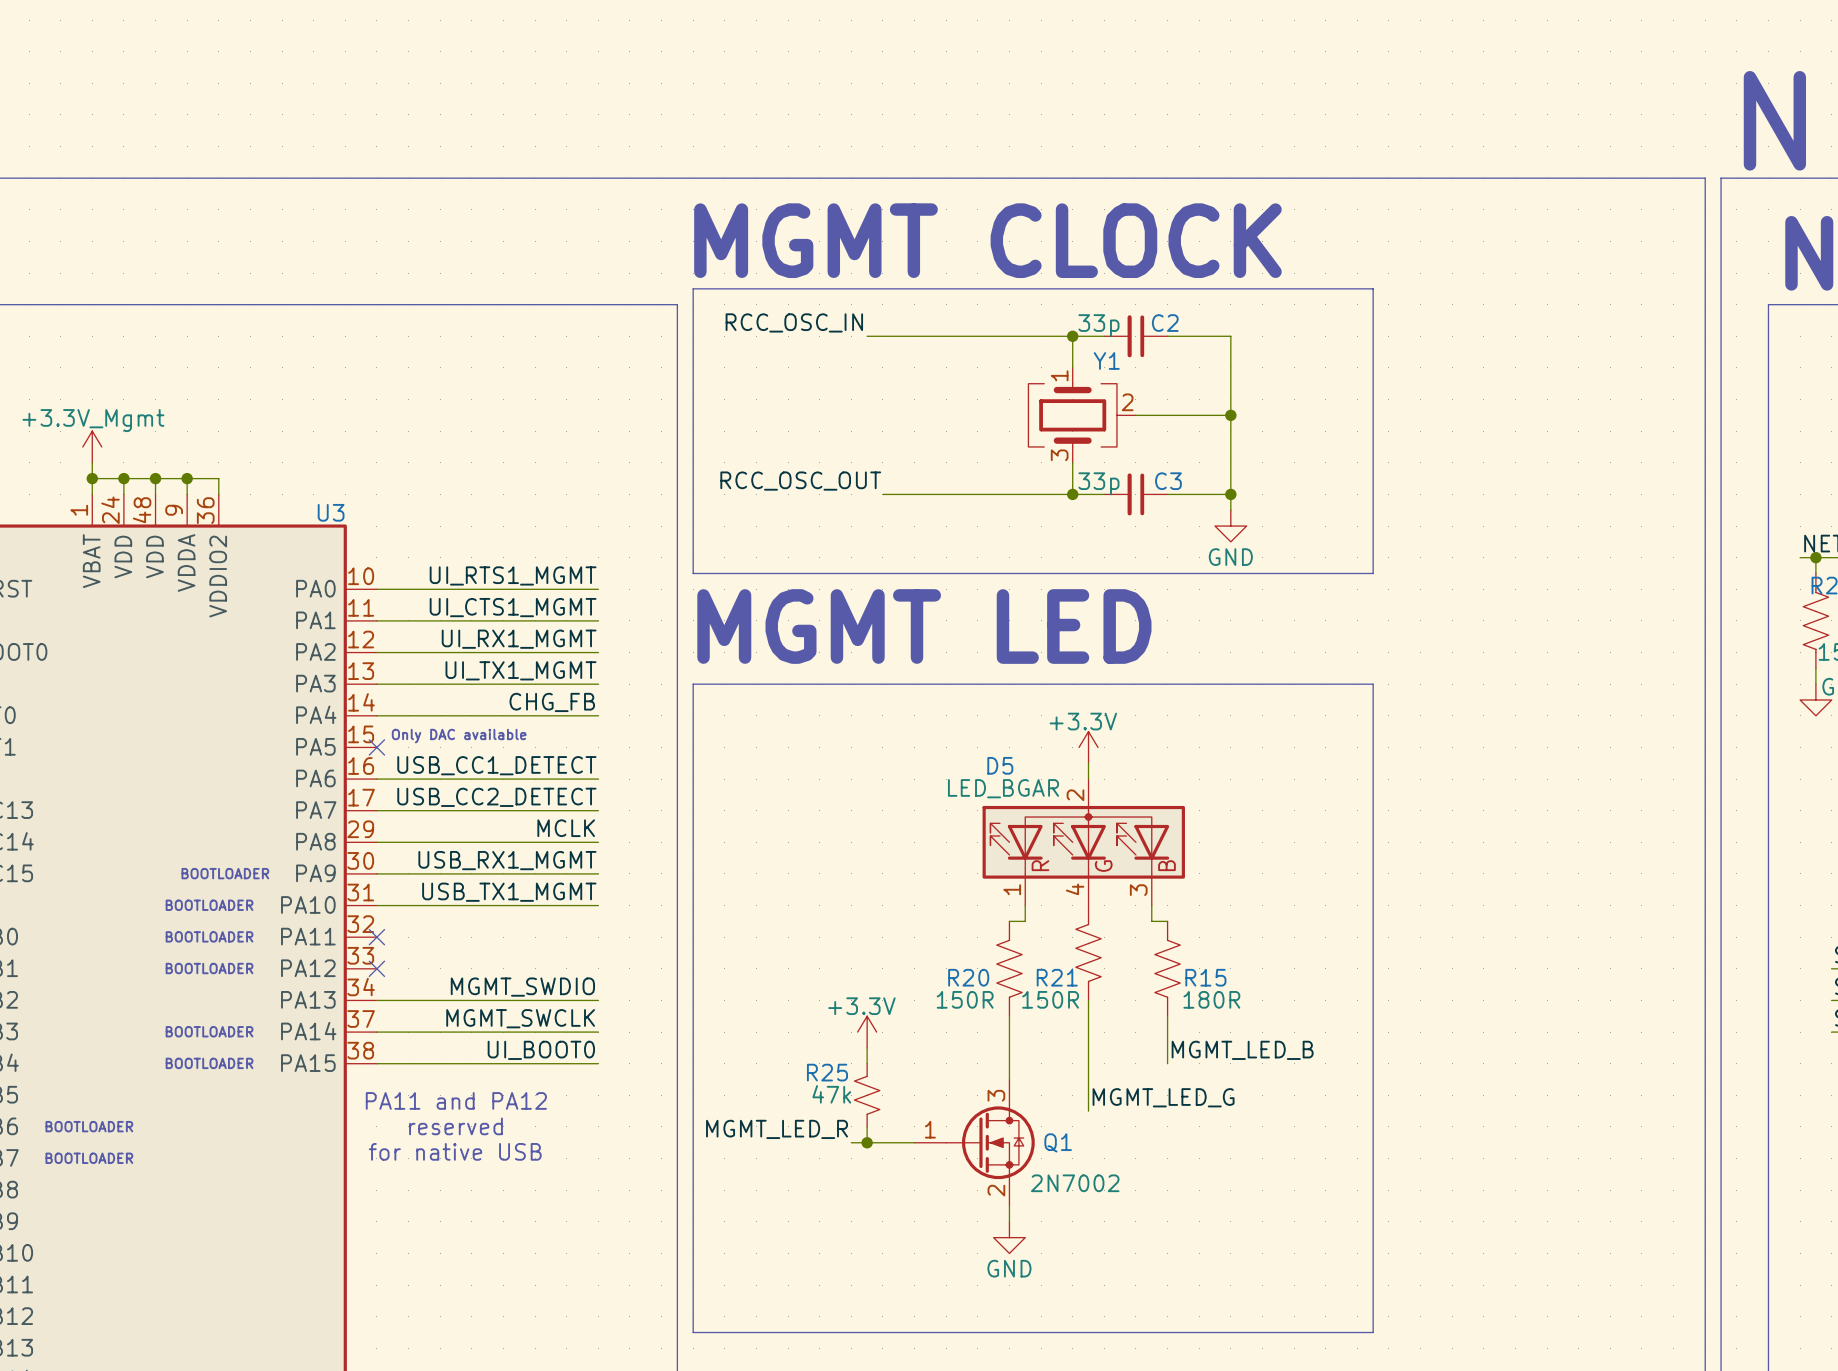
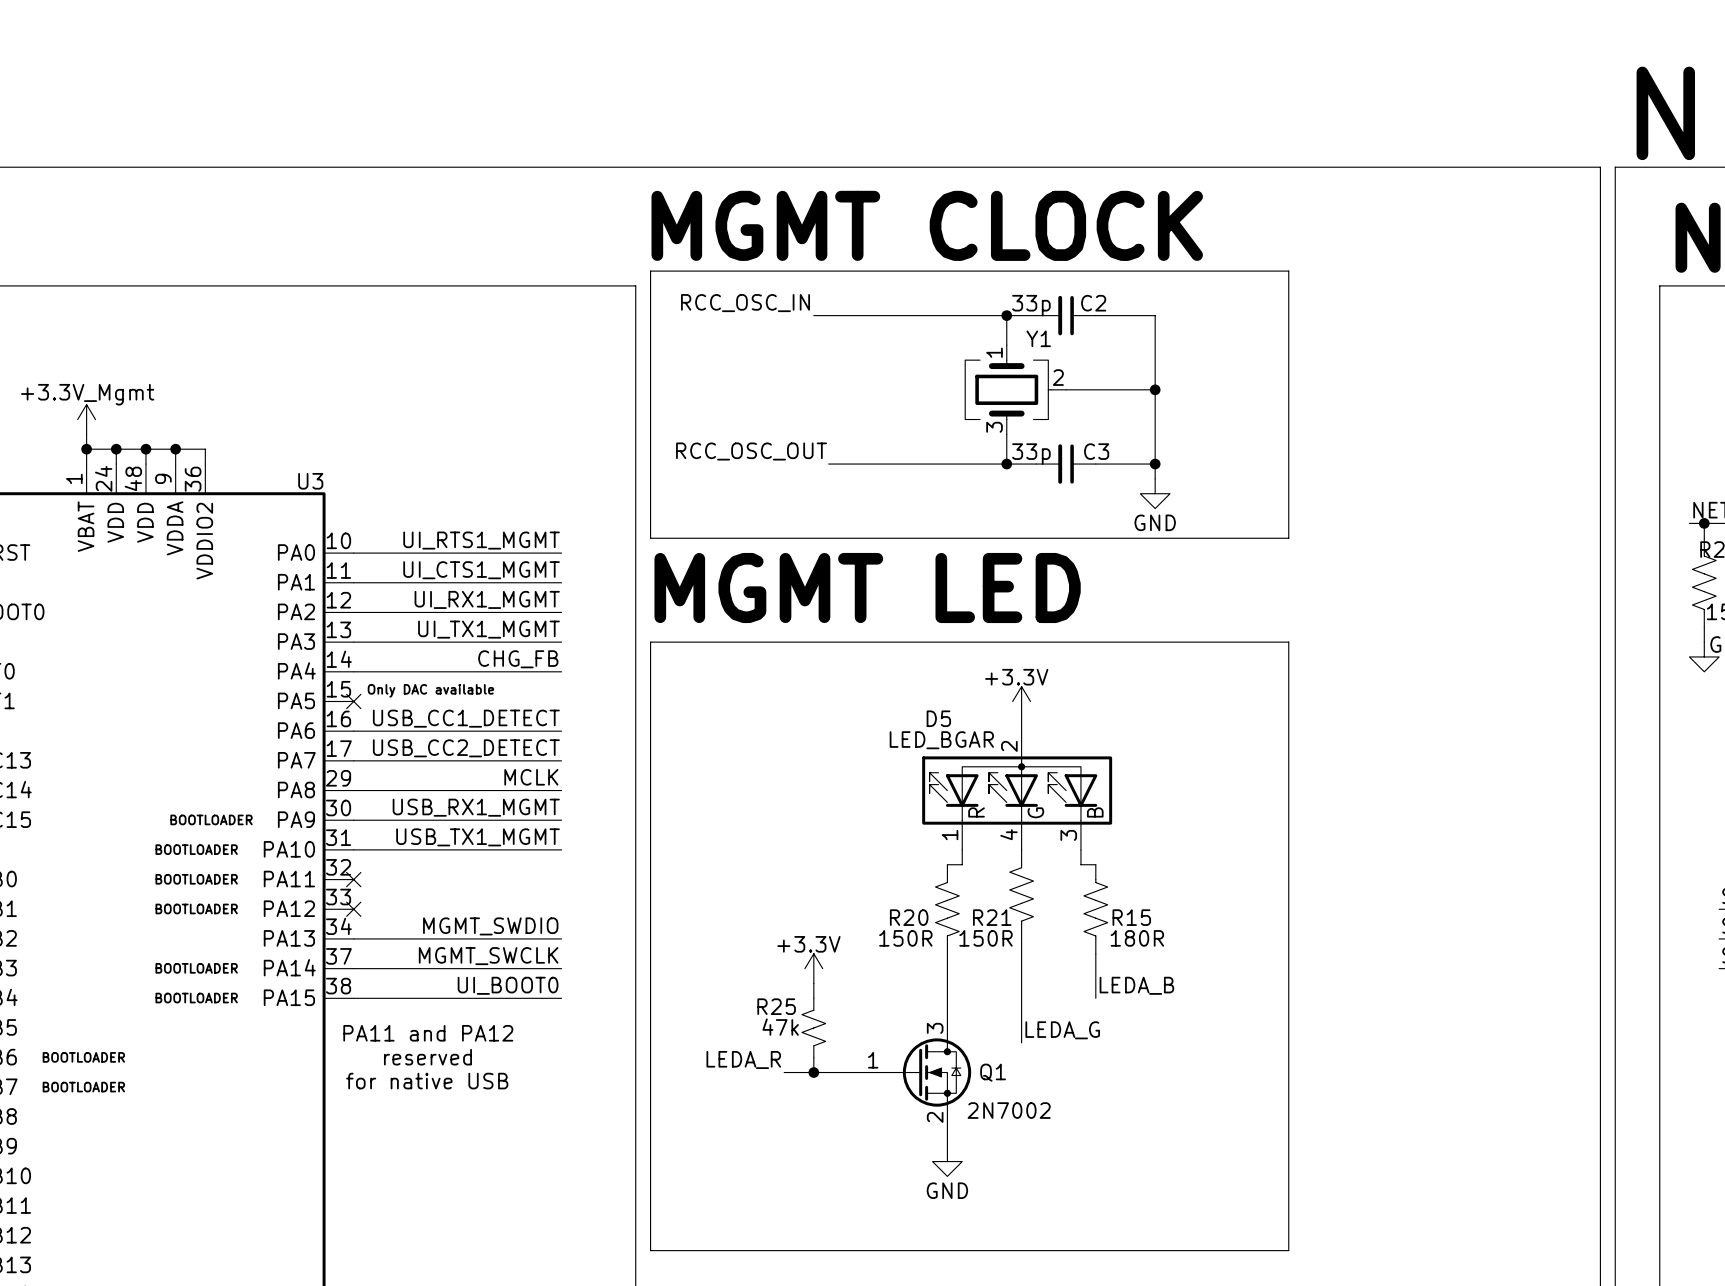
label: MGMT_LED_B (1242, 1050) -> LEDA_B (1136, 985)
label: MGMT_LED_G (1163, 1097) -> LEDA_G (1062, 1030)
label: MGMT_LED_R (777, 1129) -> LEDA_R (743, 1059)
wire: none -> (784, 1072) (798, 1072)

